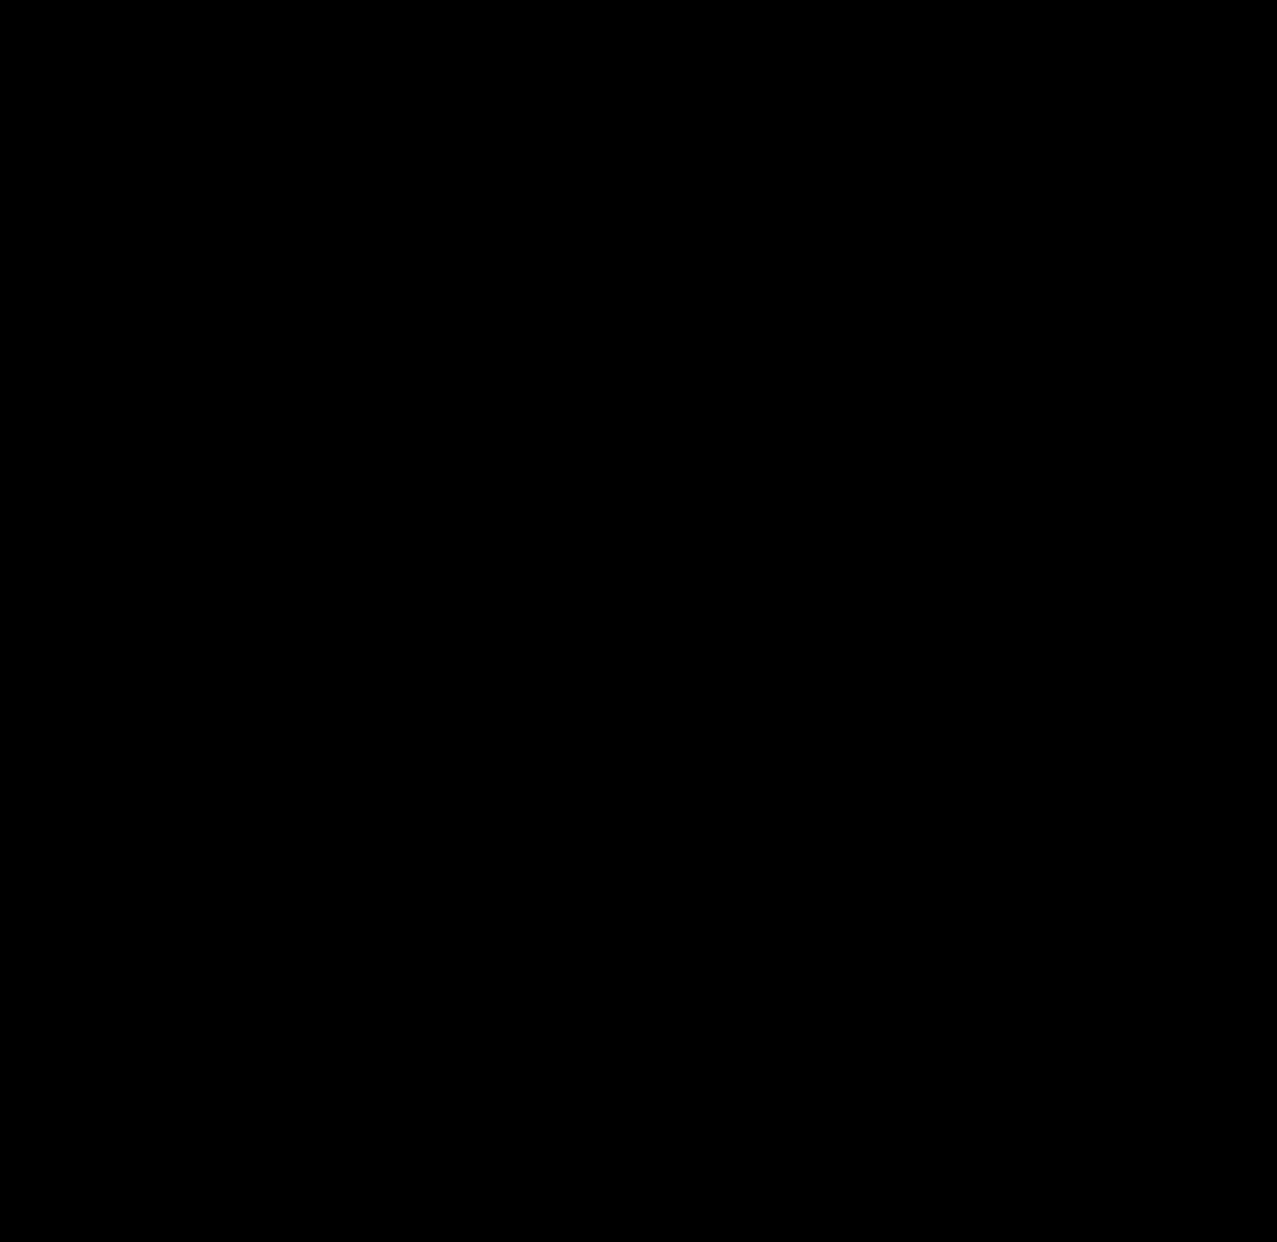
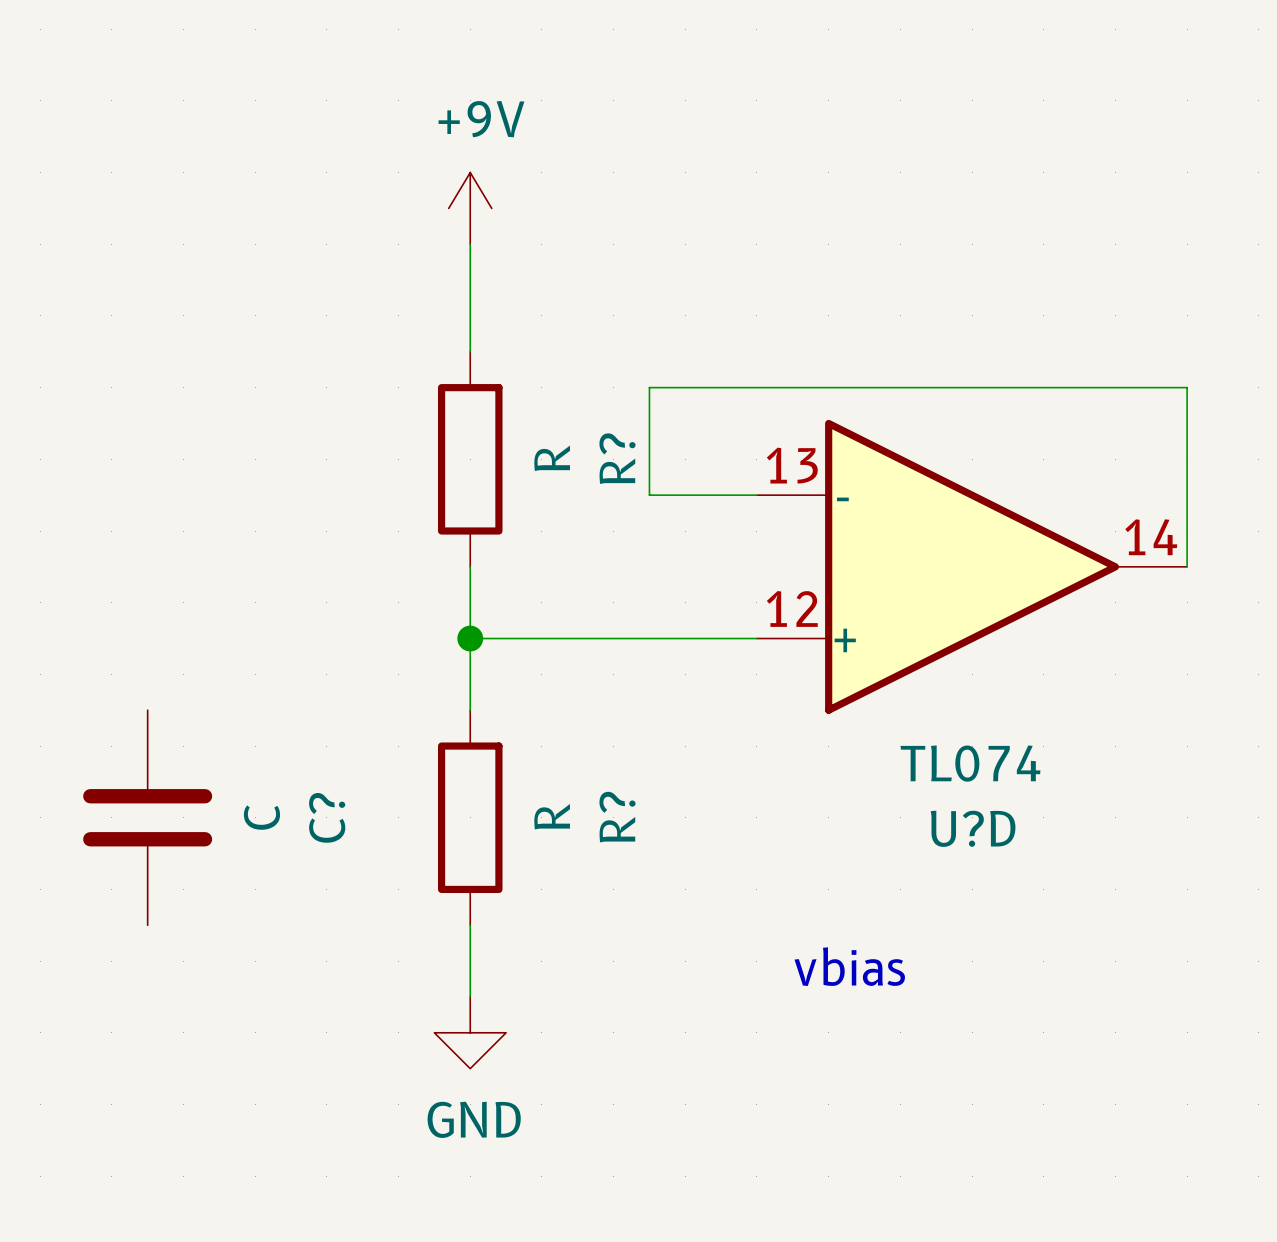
power symbol: none -> +9V (470, 208)
wire: none -> (470, 244) (470, 351)
R?: none -> R (470, 459)
wire: none -> (756, 495) (649, 495) (649, 387) (1187, 387) (1187, 566)
wire: none -> (470, 566) (470, 710)
U?D: none -> TL074 (972, 566)
wire: none -> (470, 638) (756, 638)
junction: none -> (470, 638)
C?: none -> C (147, 817)
R?: none -> R (470, 817)
wire: none -> (470, 925) (470, 996)
text: none -> vbias (849, 966)
power symbol: none -> GND (470, 1032)

